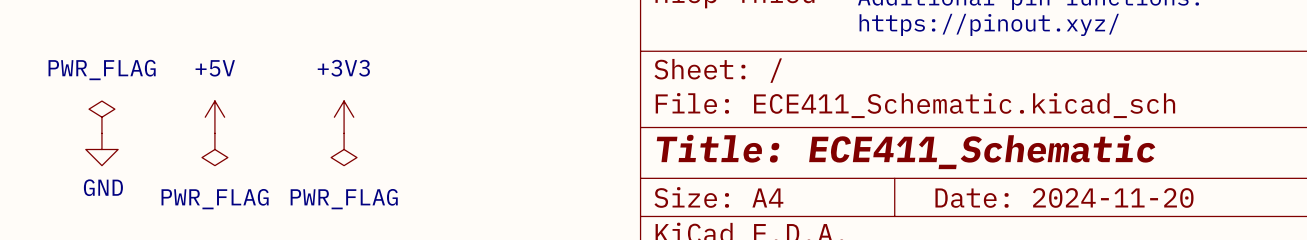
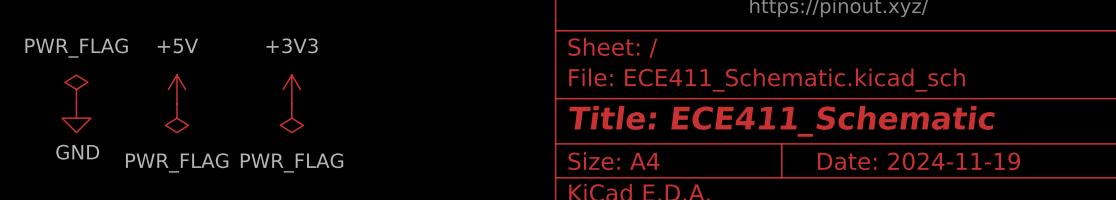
title block: Date: 2024-11-20 (1064, 197) -> Date: 2024-11-19 (919, 161)

